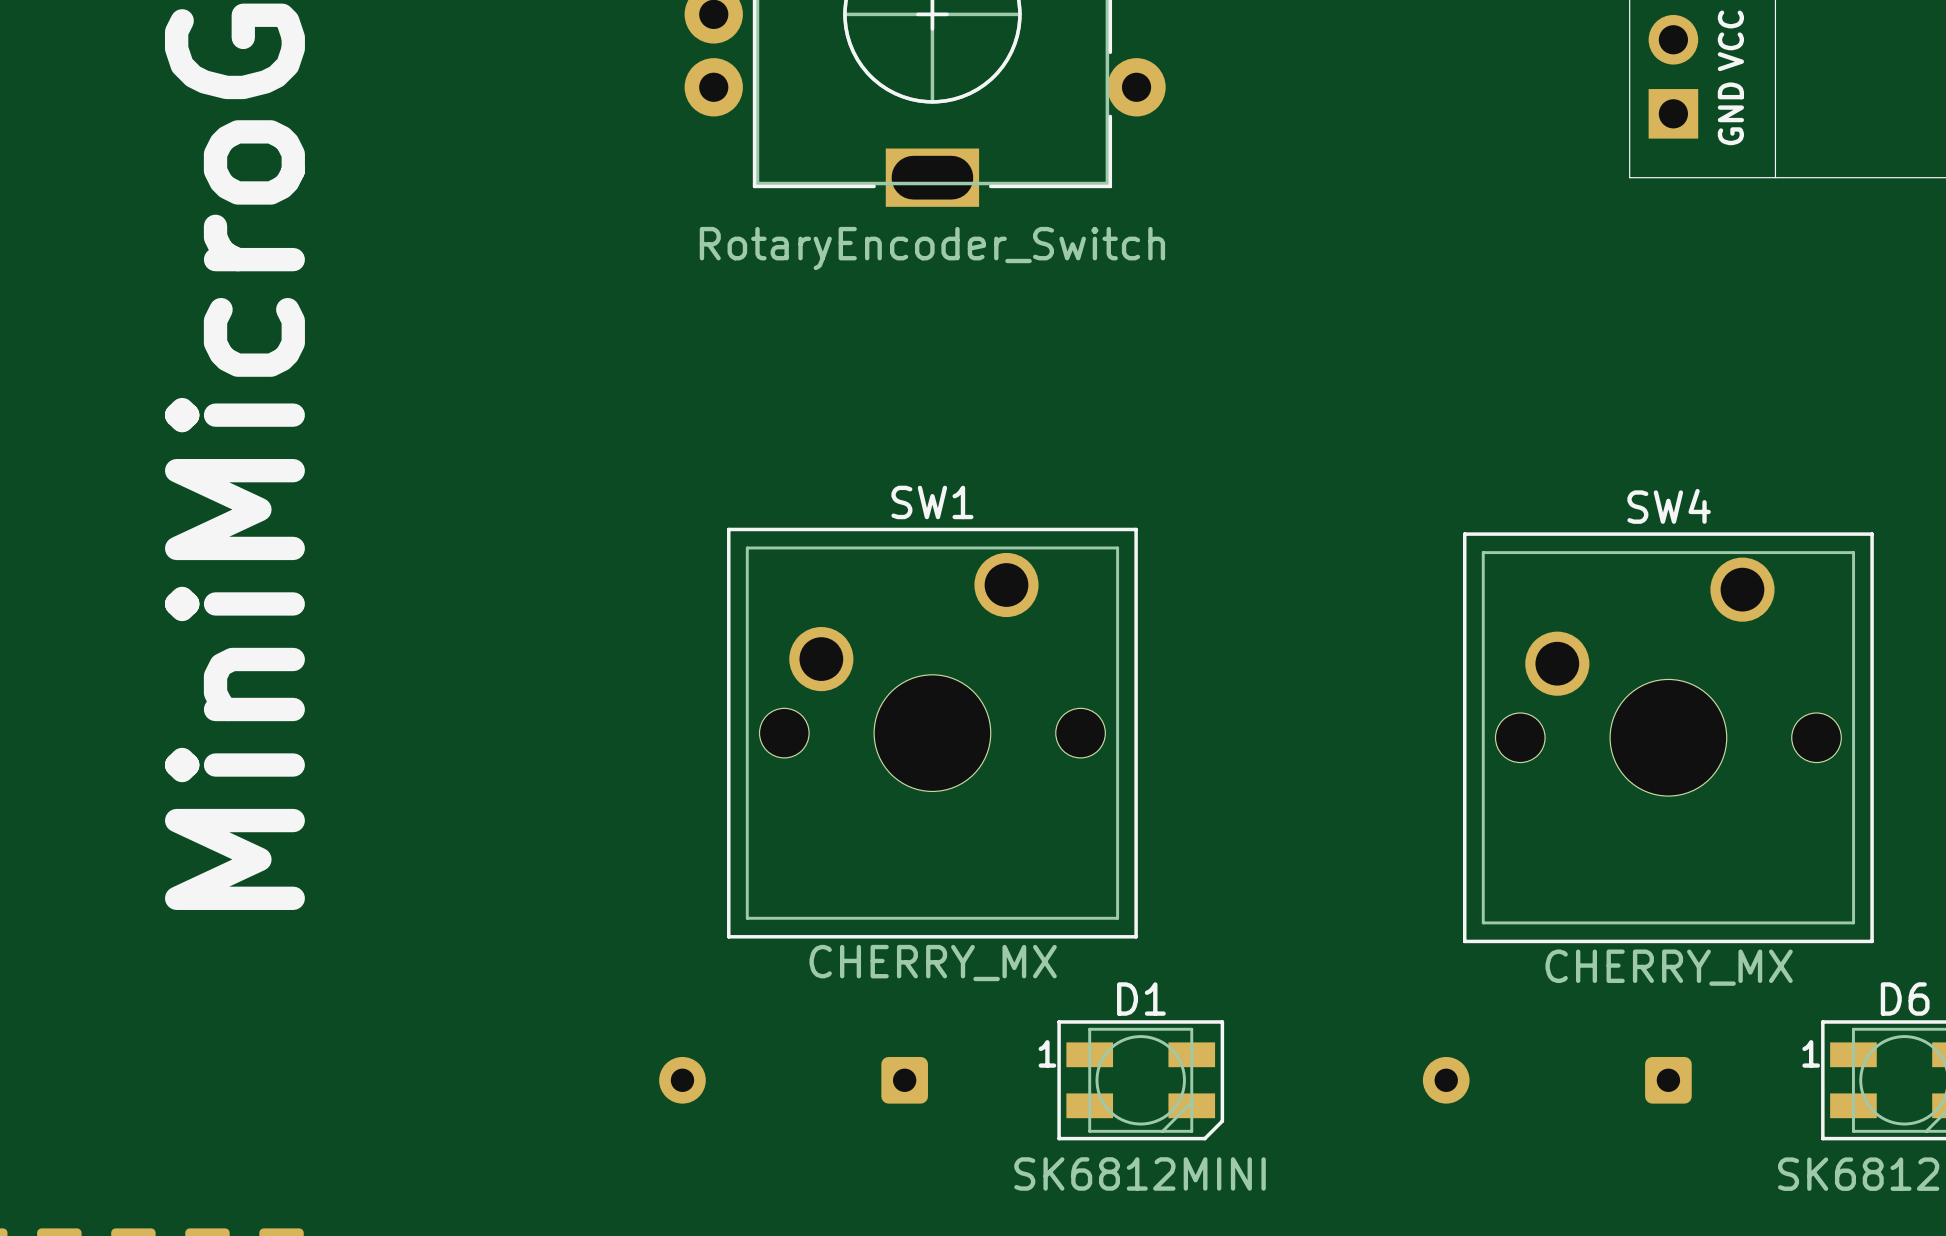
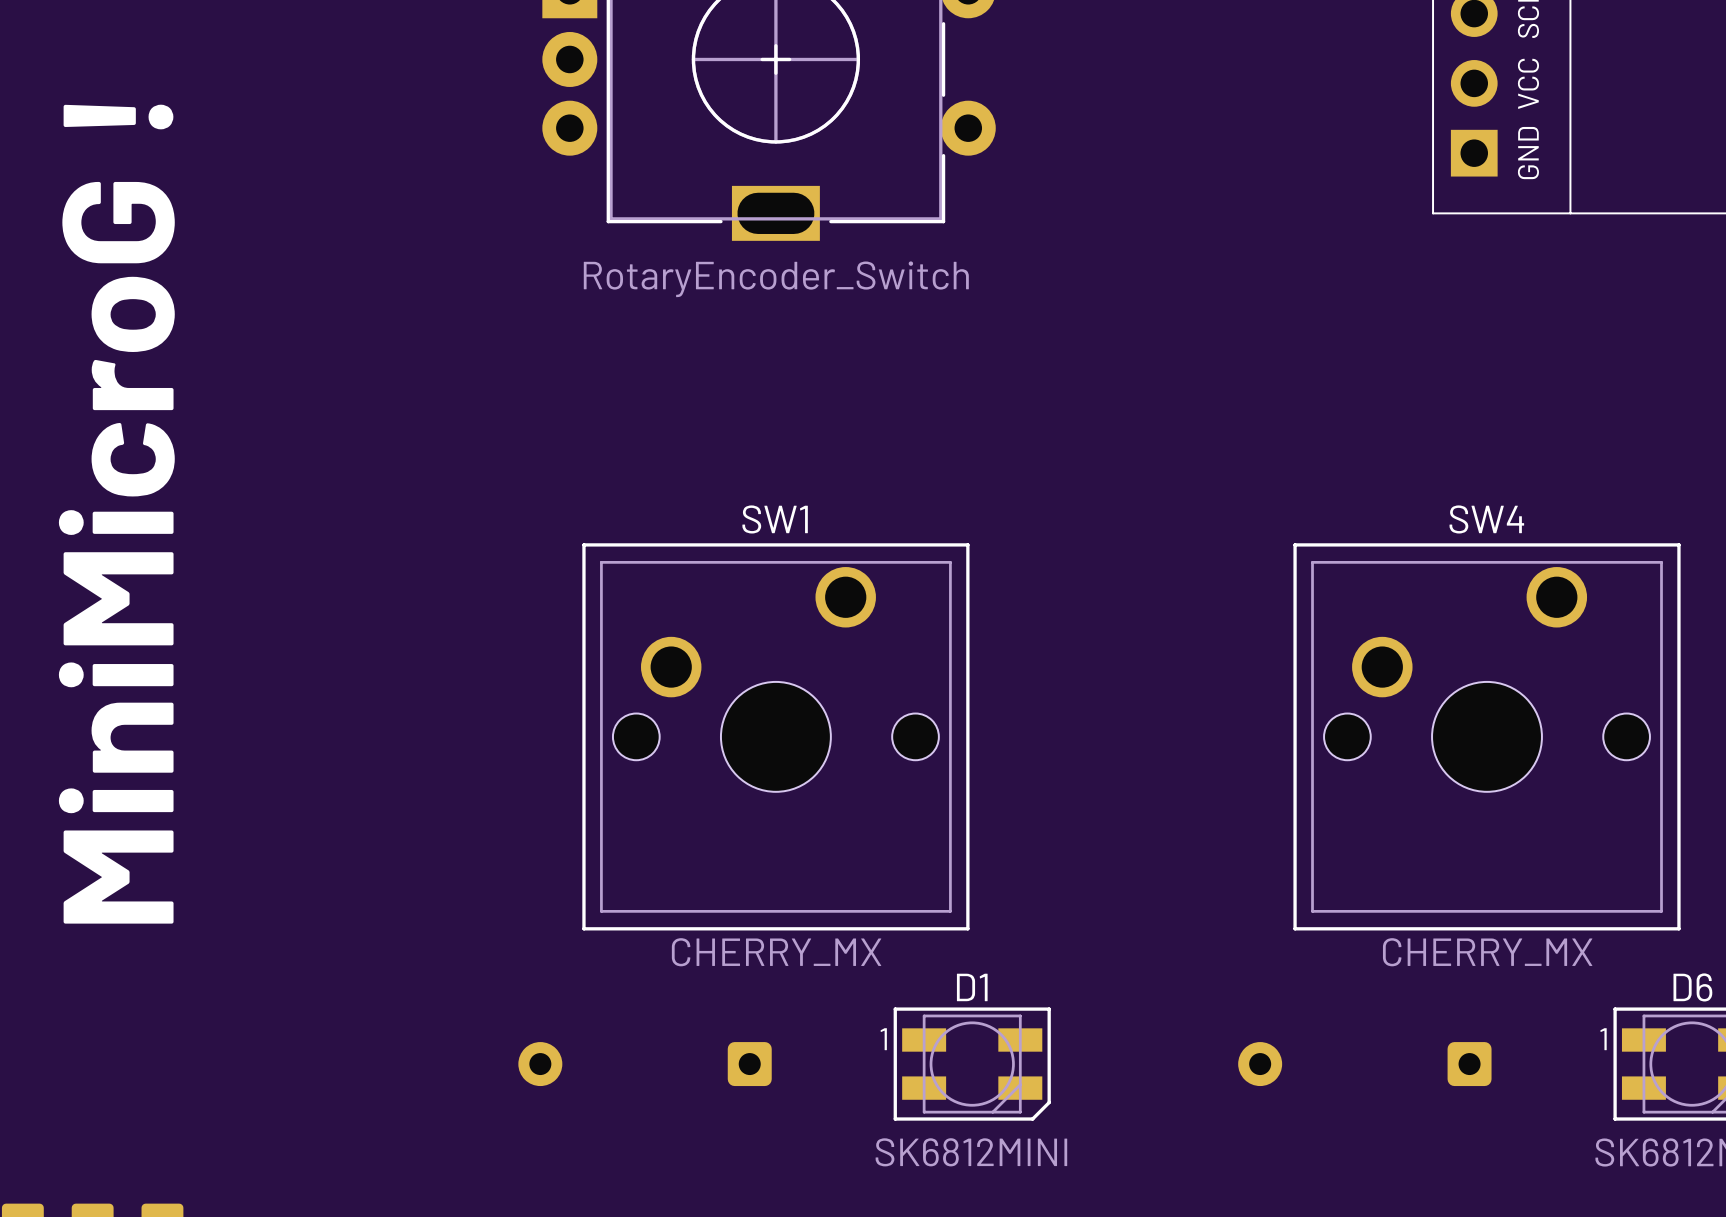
SW4 position: (1668, 737) -> (1487, 736)

